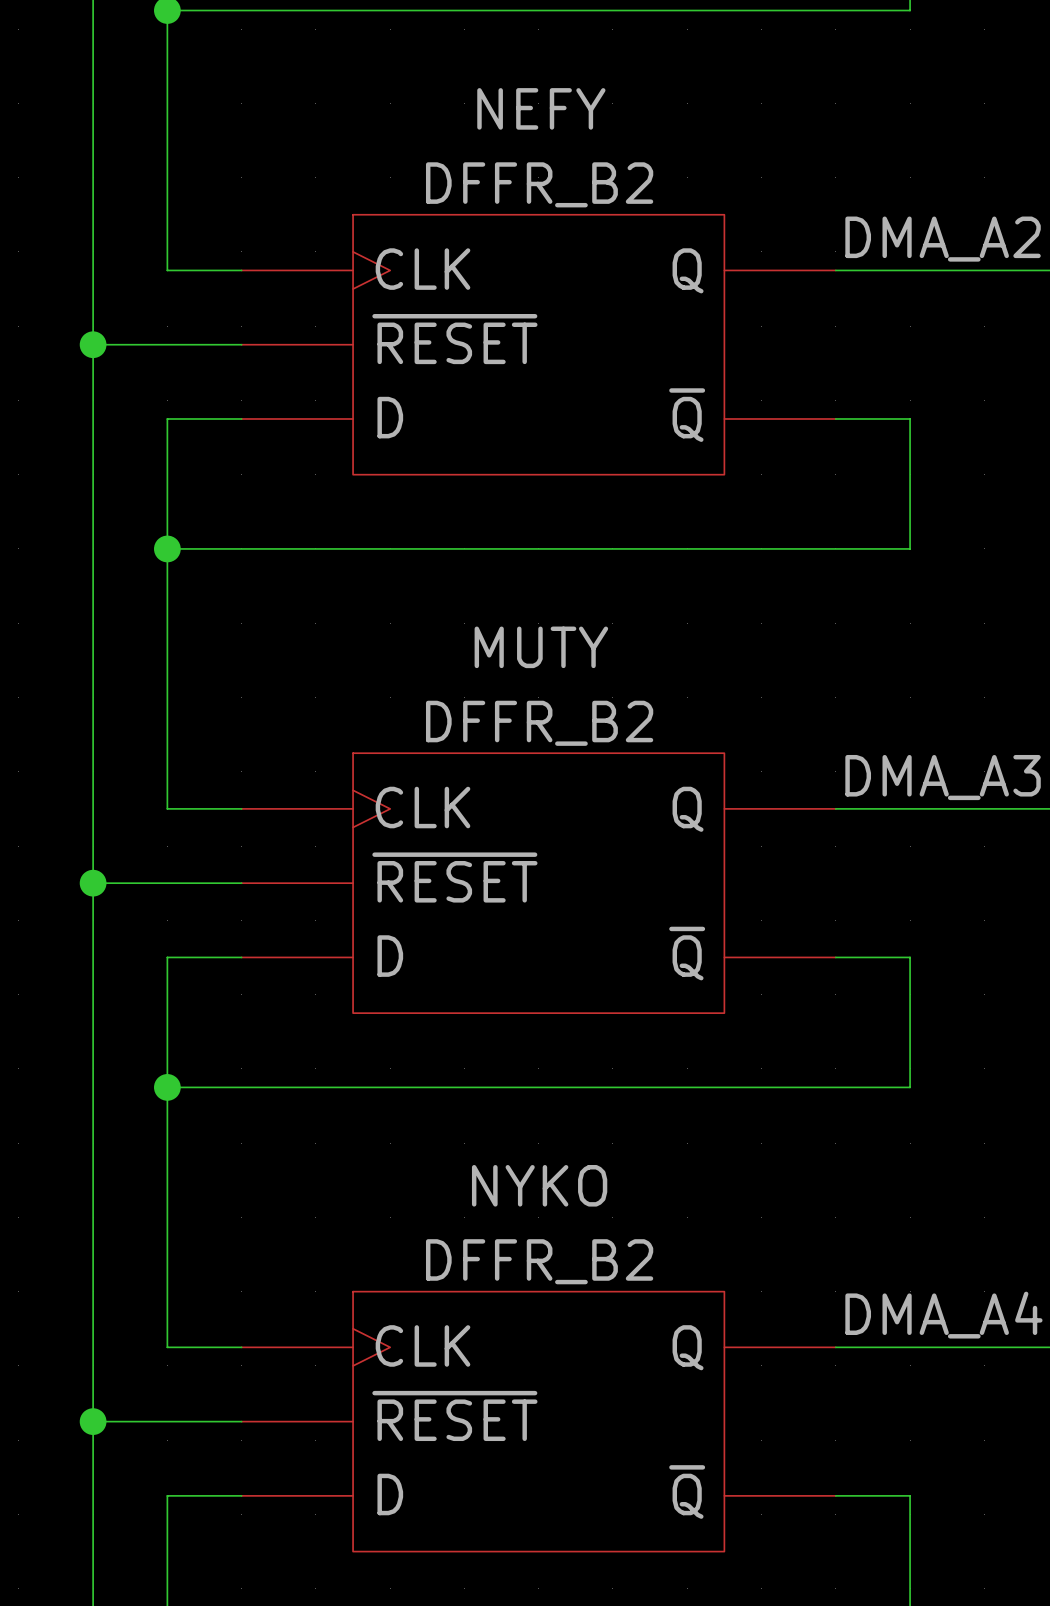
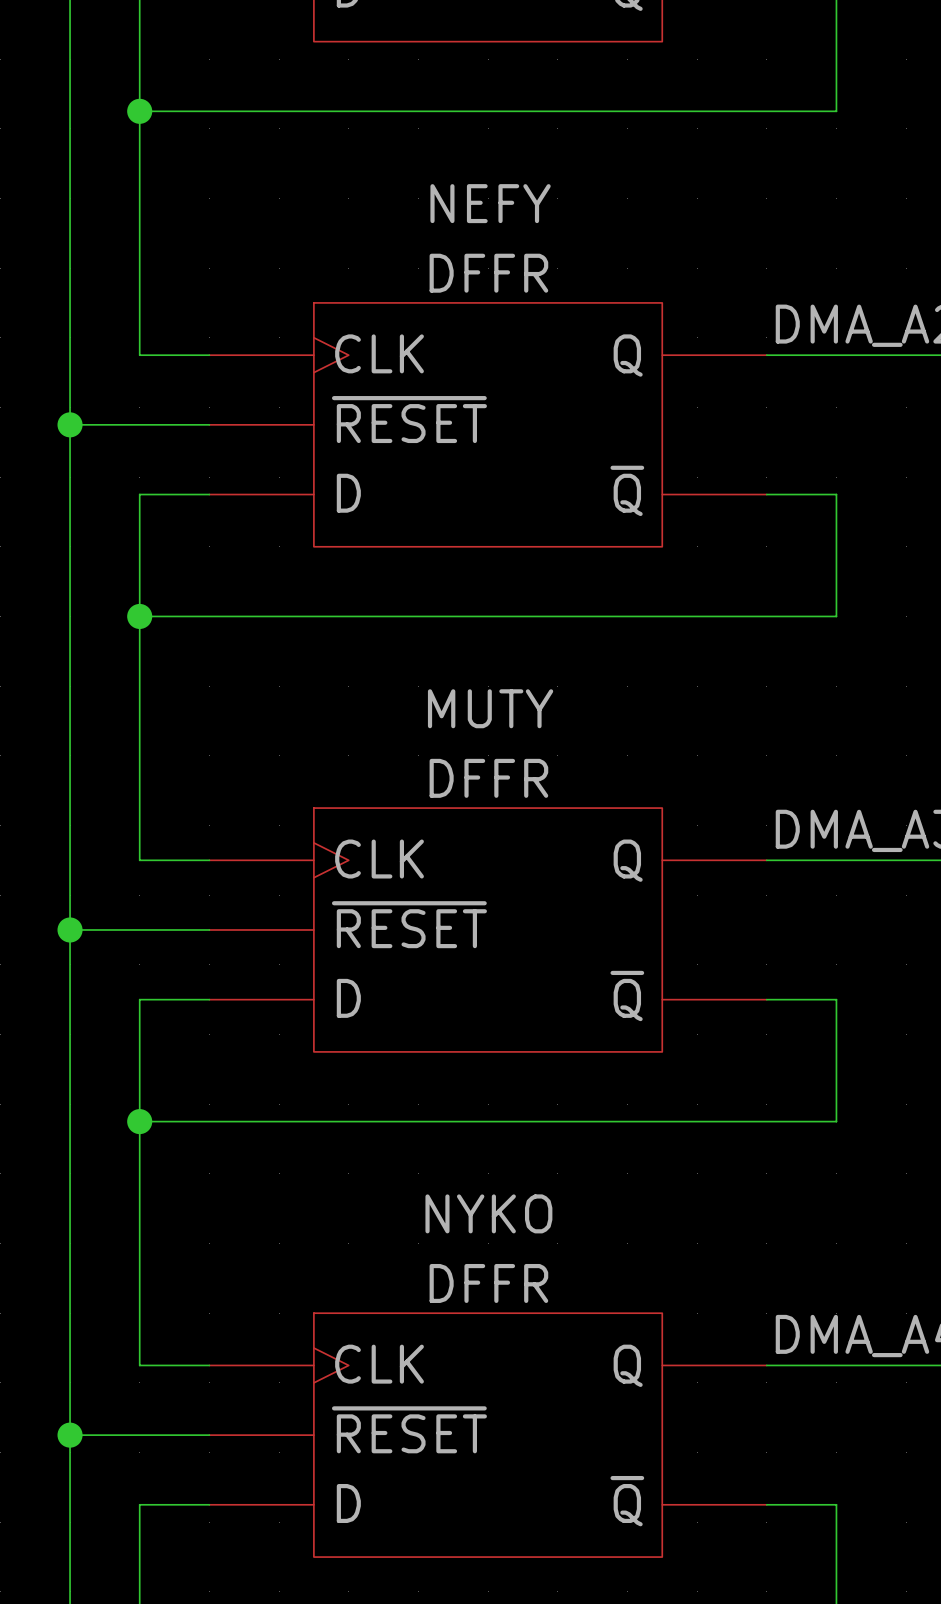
NEFY value: DFFR_B2 (539, 184) -> DFFR (488, 273)
MUTY value: DFFR_B2 (539, 723) -> DFFR (488, 778)
NYKO value: DFFR_B2 (539, 1261) -> DFFR (488, 1283)

